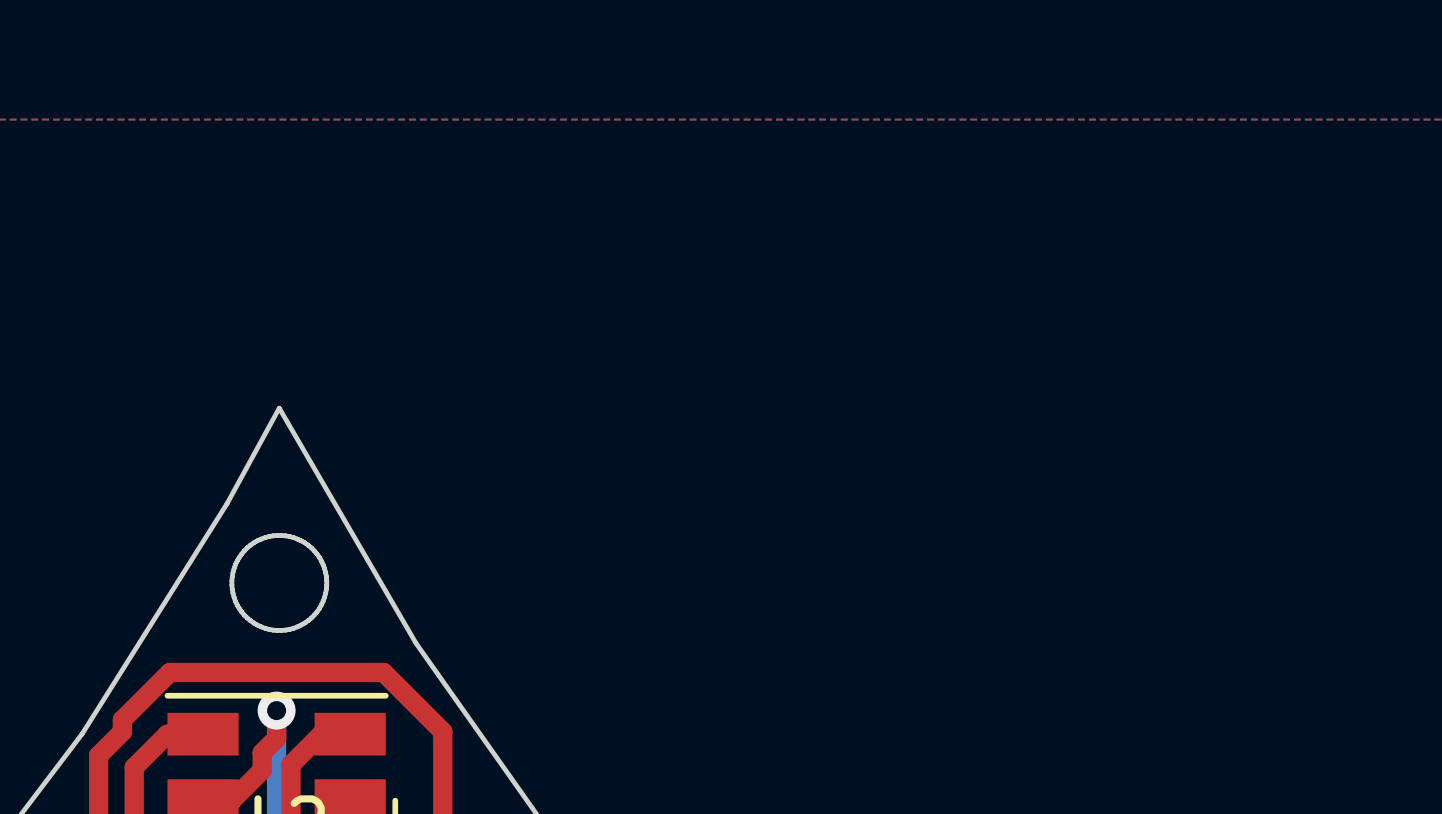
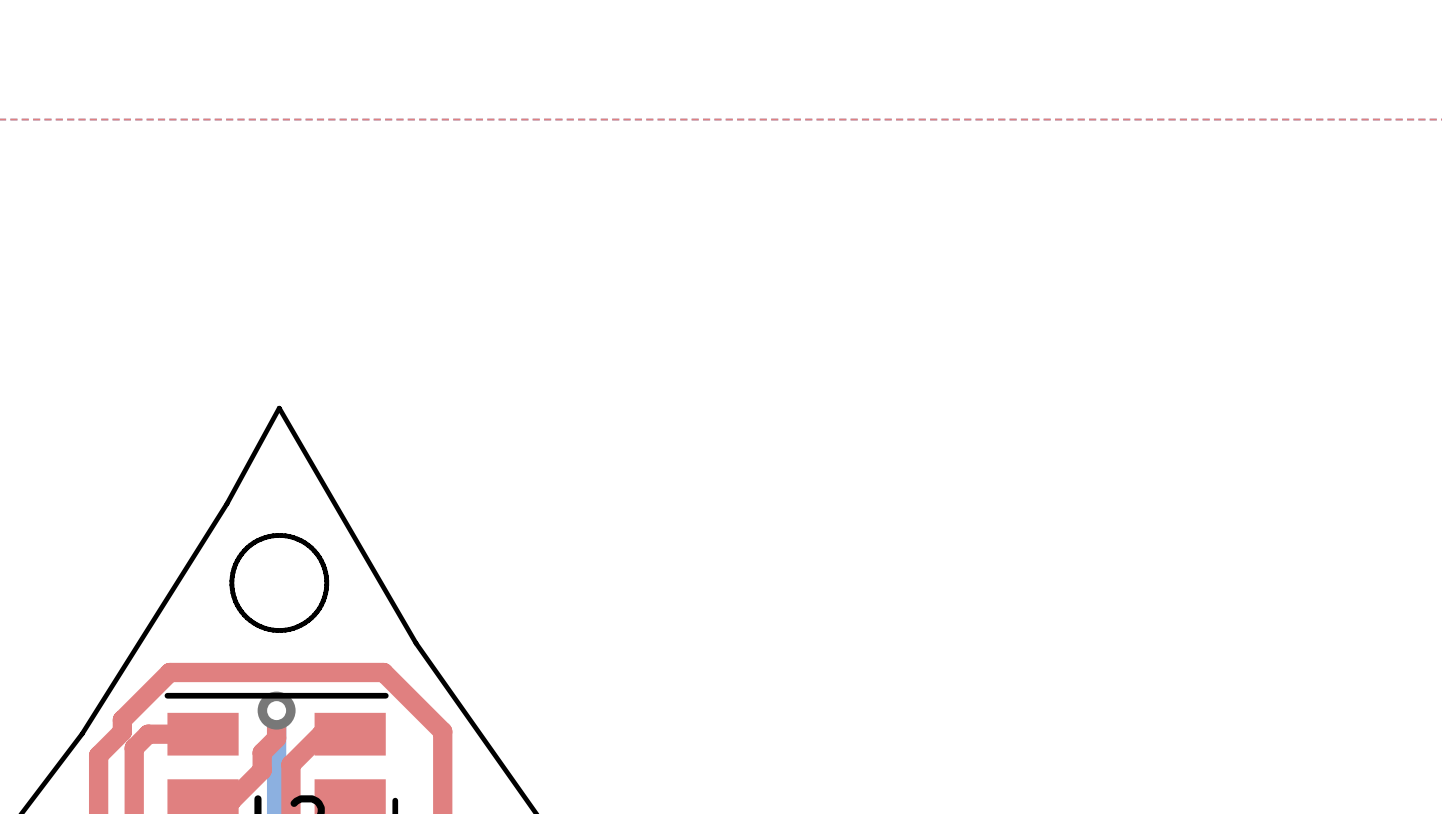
top track: (167, 734) (134, 767) -> (167, 734) (148, 734) (134, 748) (134, 767)

